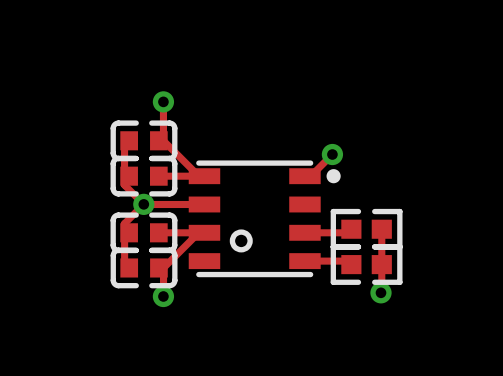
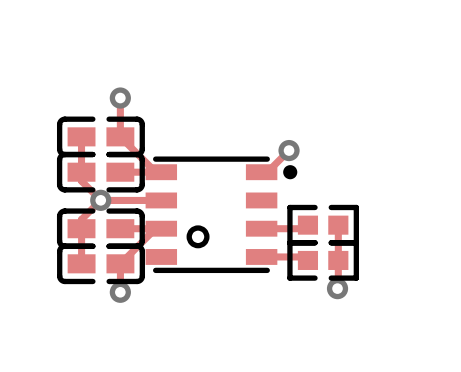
part footprint: [110, 120, 178, 162] -> [56, 116, 145, 158]
part footprint: [110, 155, 178, 197] -> [56, 151, 145, 193]
part footprint: [110, 212, 178, 254] -> [56, 208, 145, 250]
part footprint: [110, 247, 178, 289] -> [57, 243, 145, 285]

